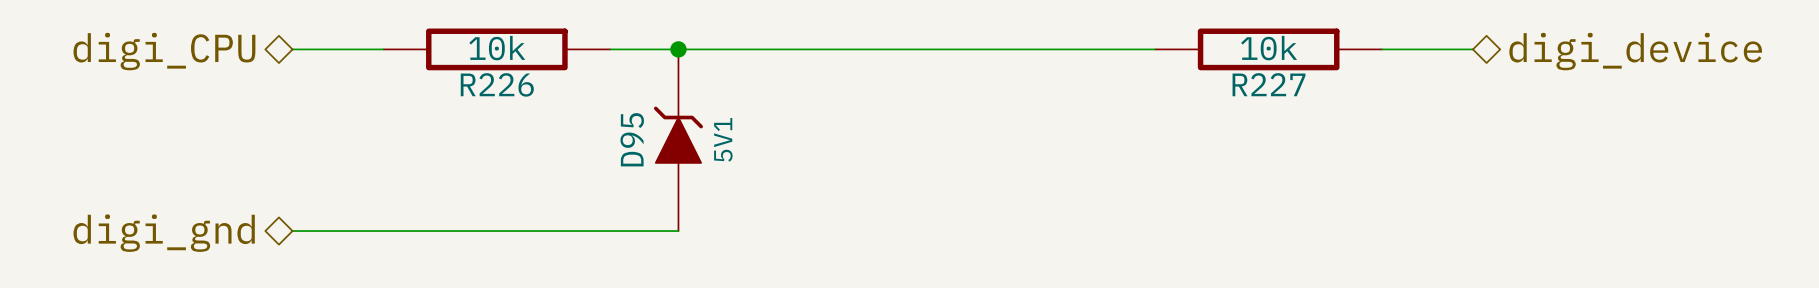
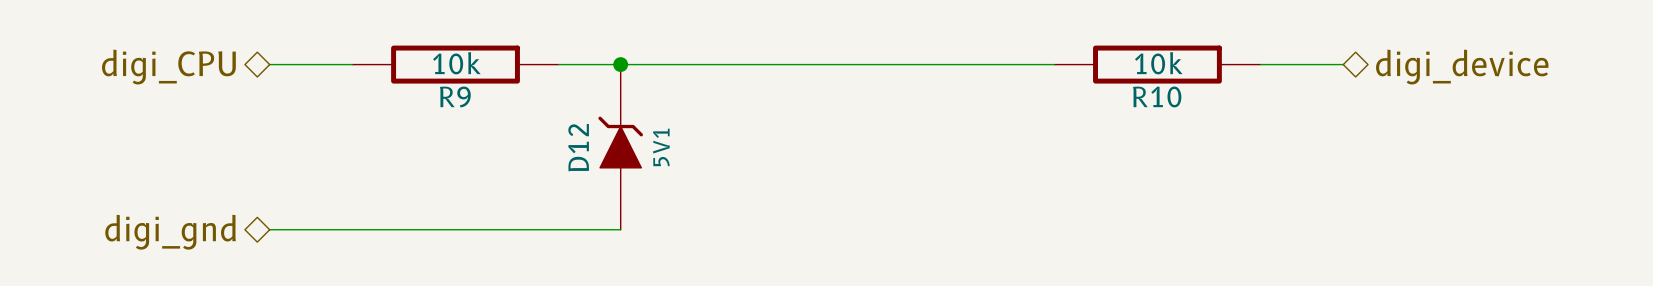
R226 name: R226 (497, 84) -> R9 (455, 96)
R227 name: R227 (1269, 84) -> R10 (1157, 96)
D95 name: D95 (632, 139) -> D12 (578, 147)

